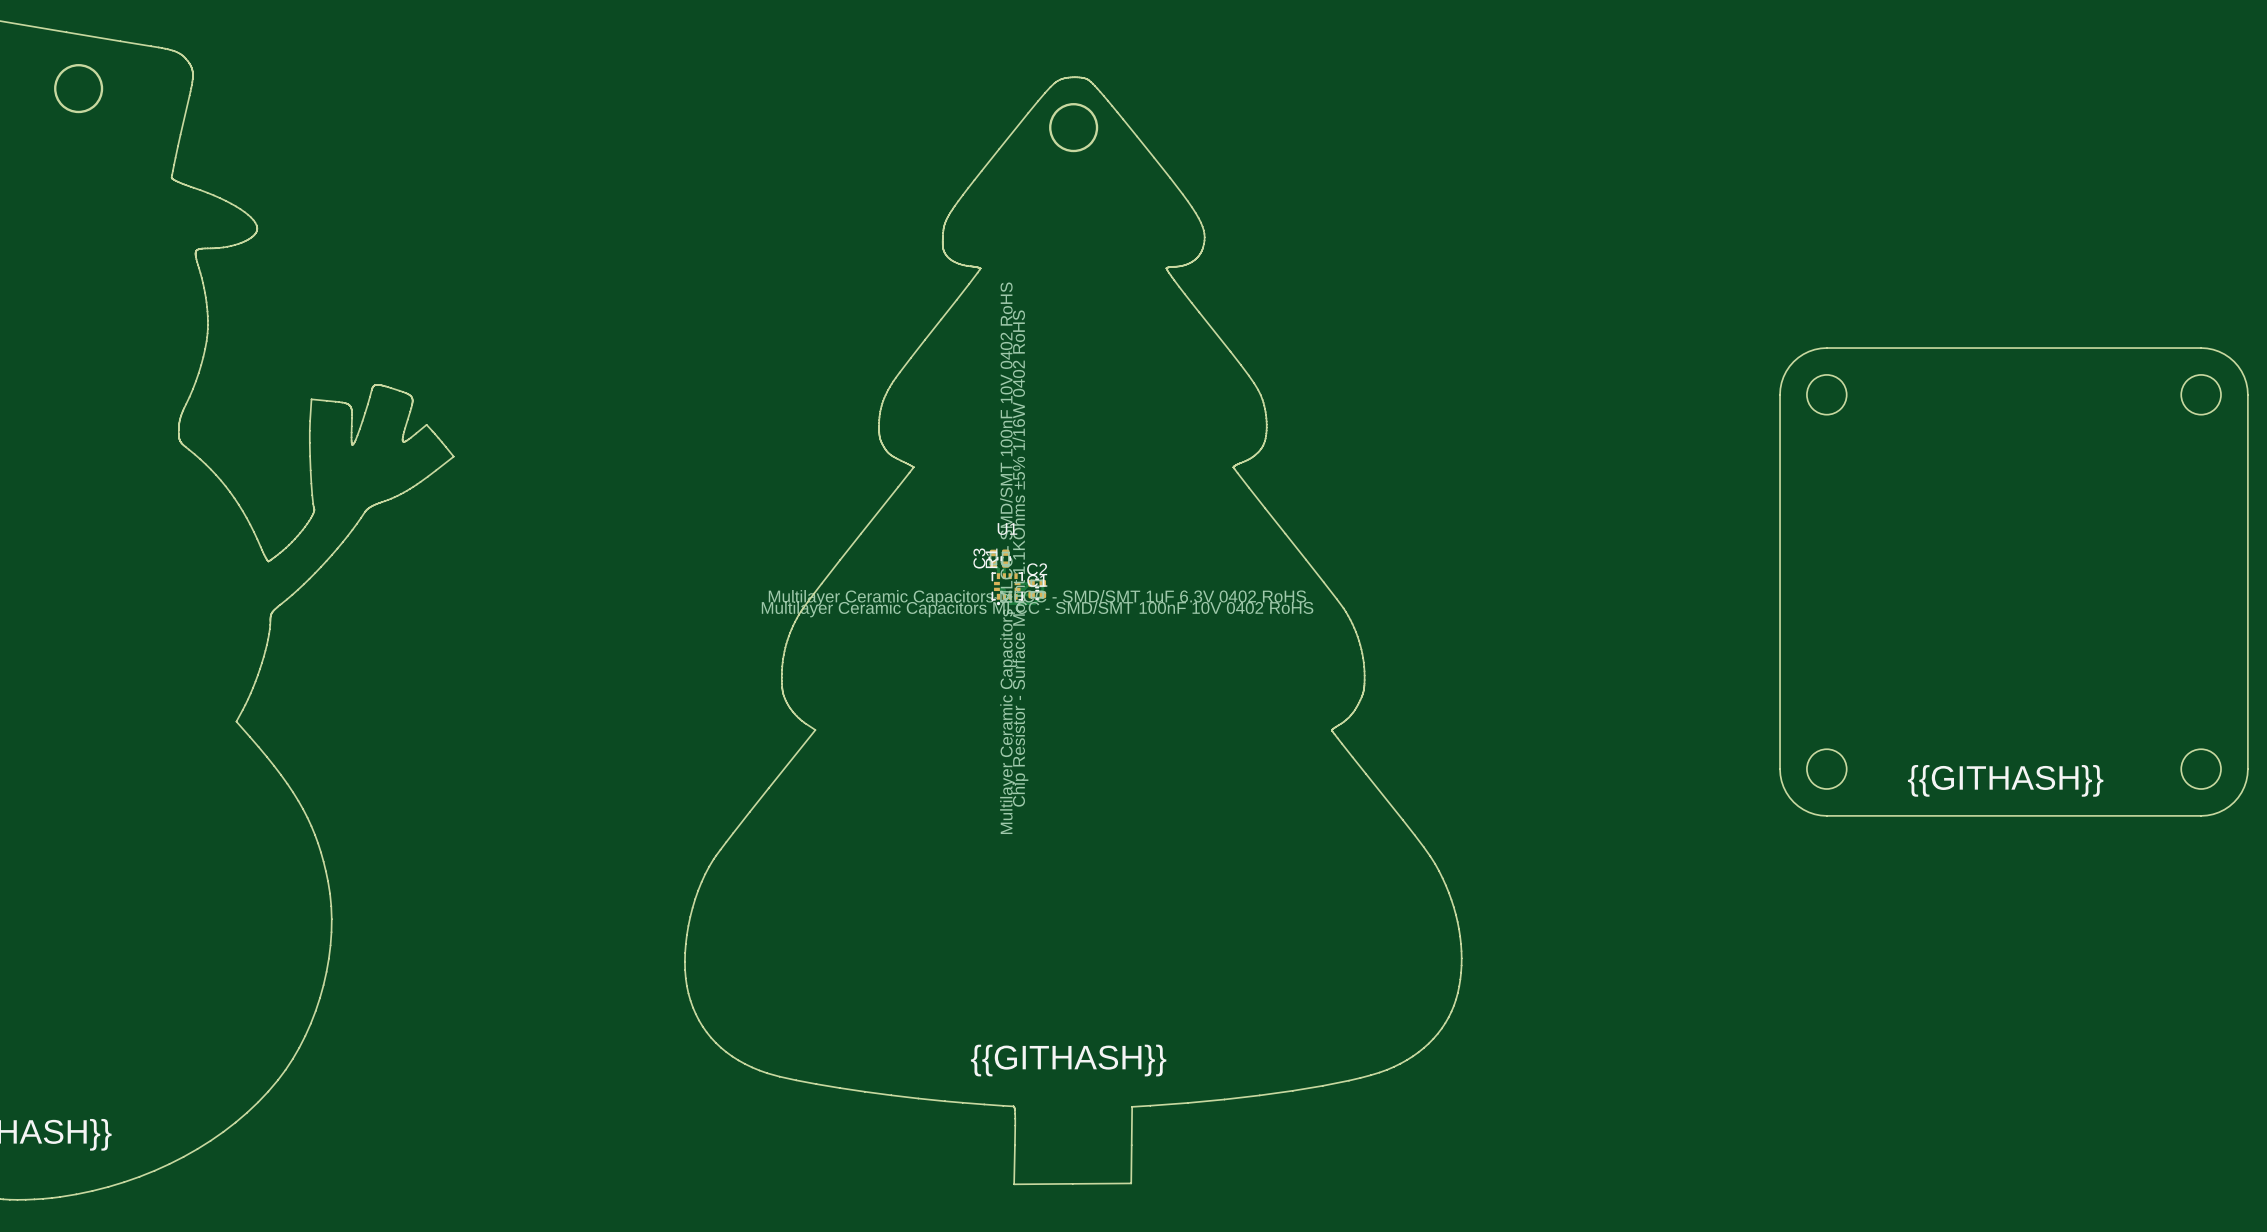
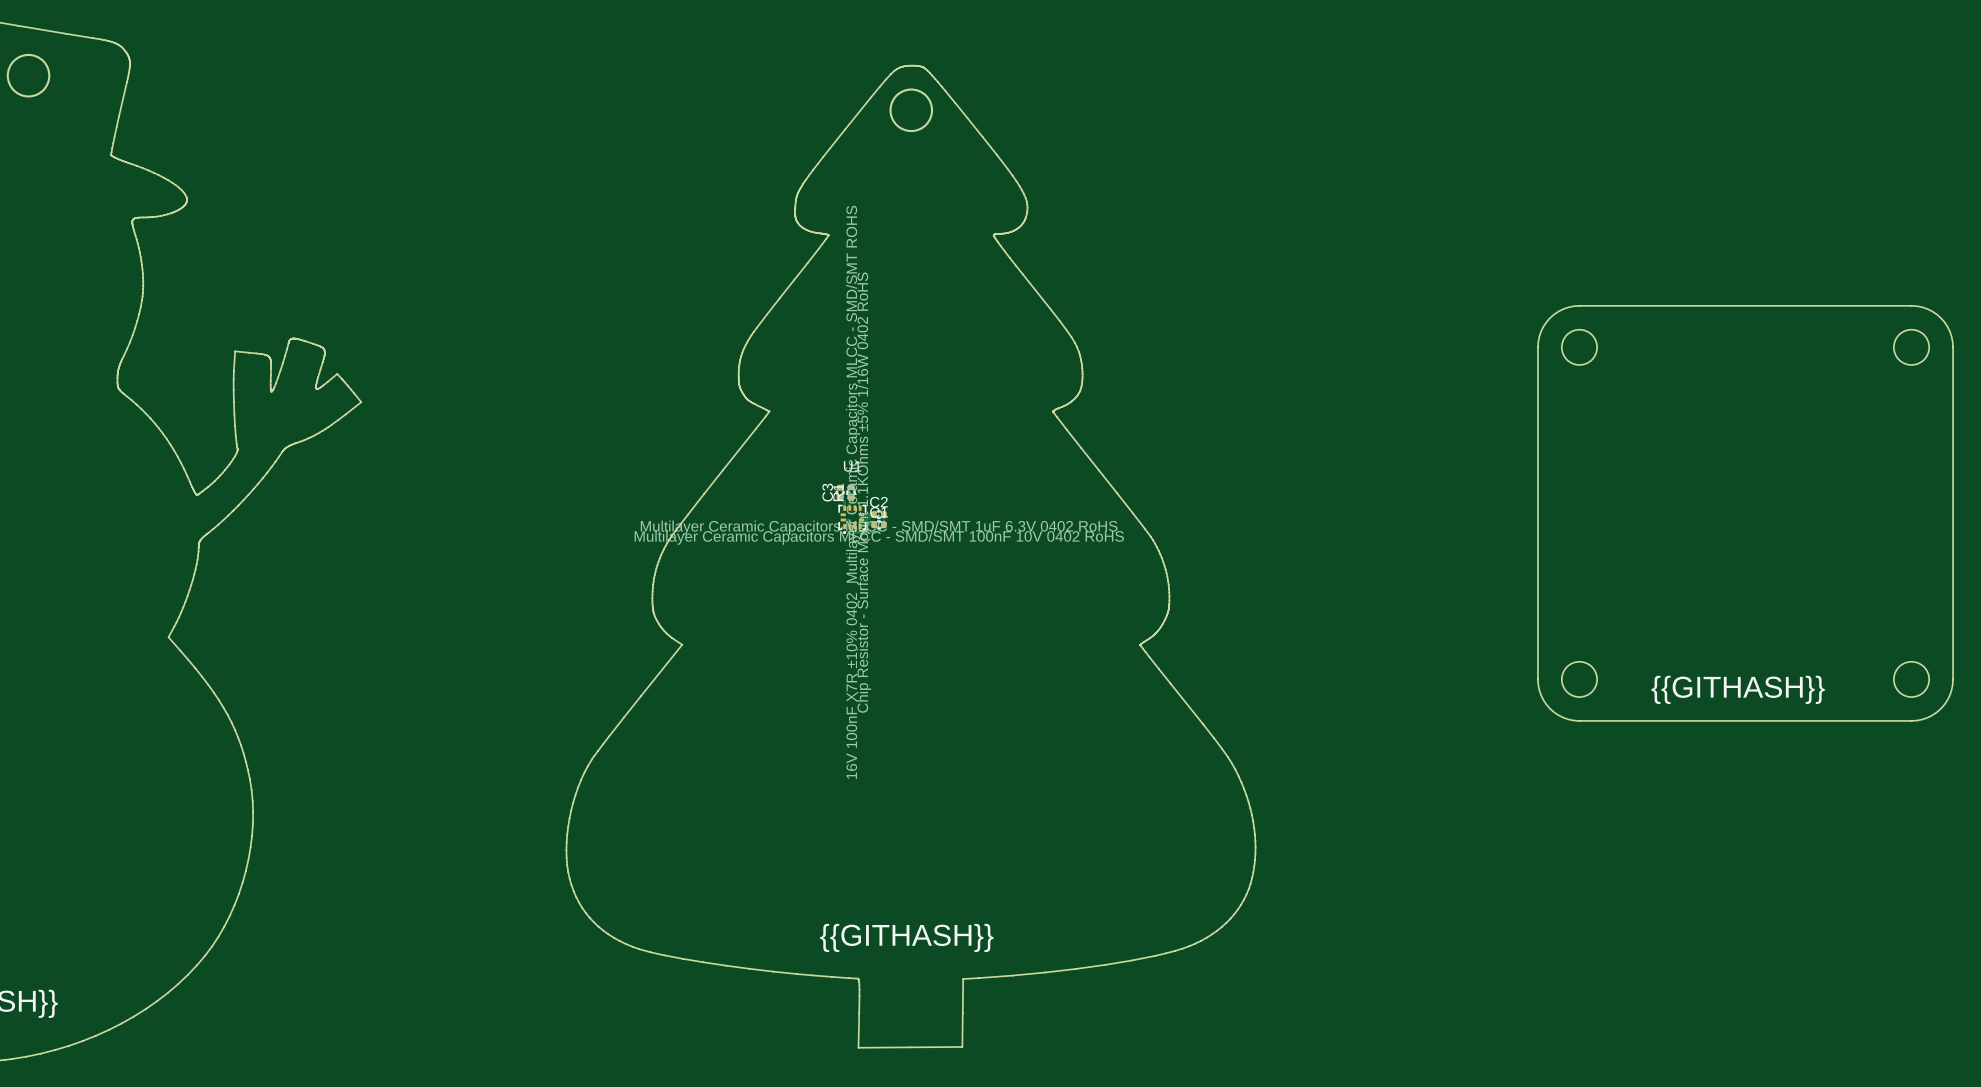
C3 value: Multilayer Ceramic Capacitors MLCC - SMD/SMT 100nF 10V 0402 RoHS (1008, 558) -> 16V 100nF X7R ±10% 0402 Multilayer Ceramic Capacitors MLCC - SMD/SMT ROHS (853, 492)

